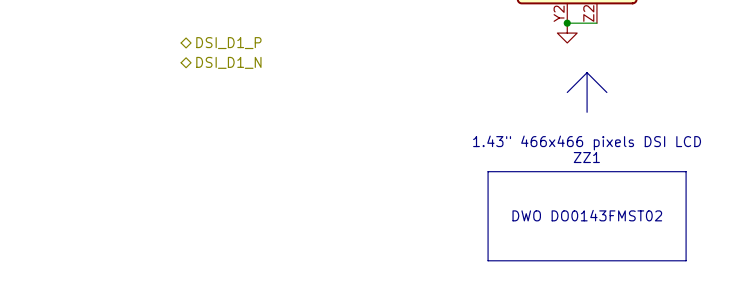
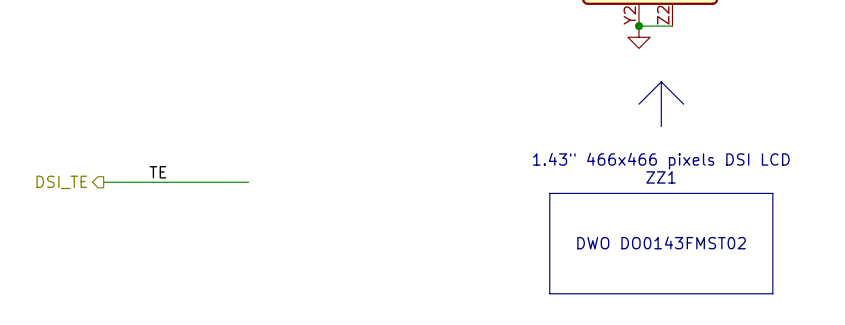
hierarchical label: DSI_D1_P (228, 43) -> none
hierarchical label: DSI_D1_N (228, 62) -> none
label: none -> TE (157, 172)
hierarchical label: none -> DSI_TE (61, 182)
wire: none -> (103, 182) (248, 182)

